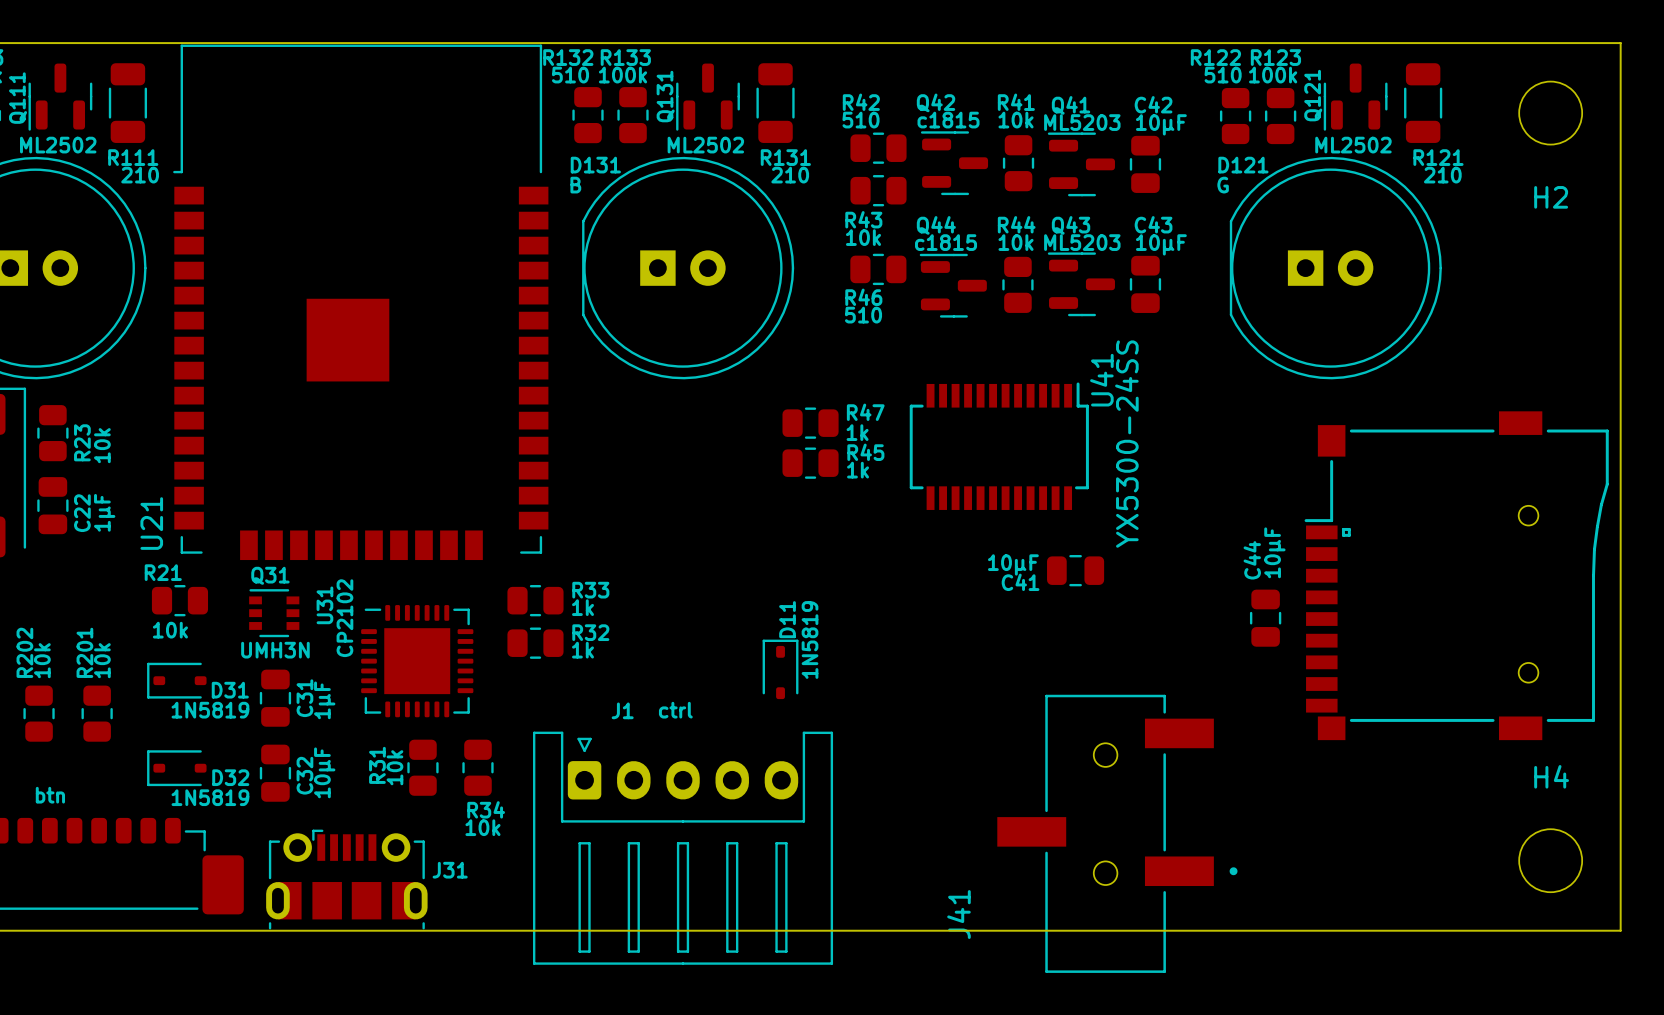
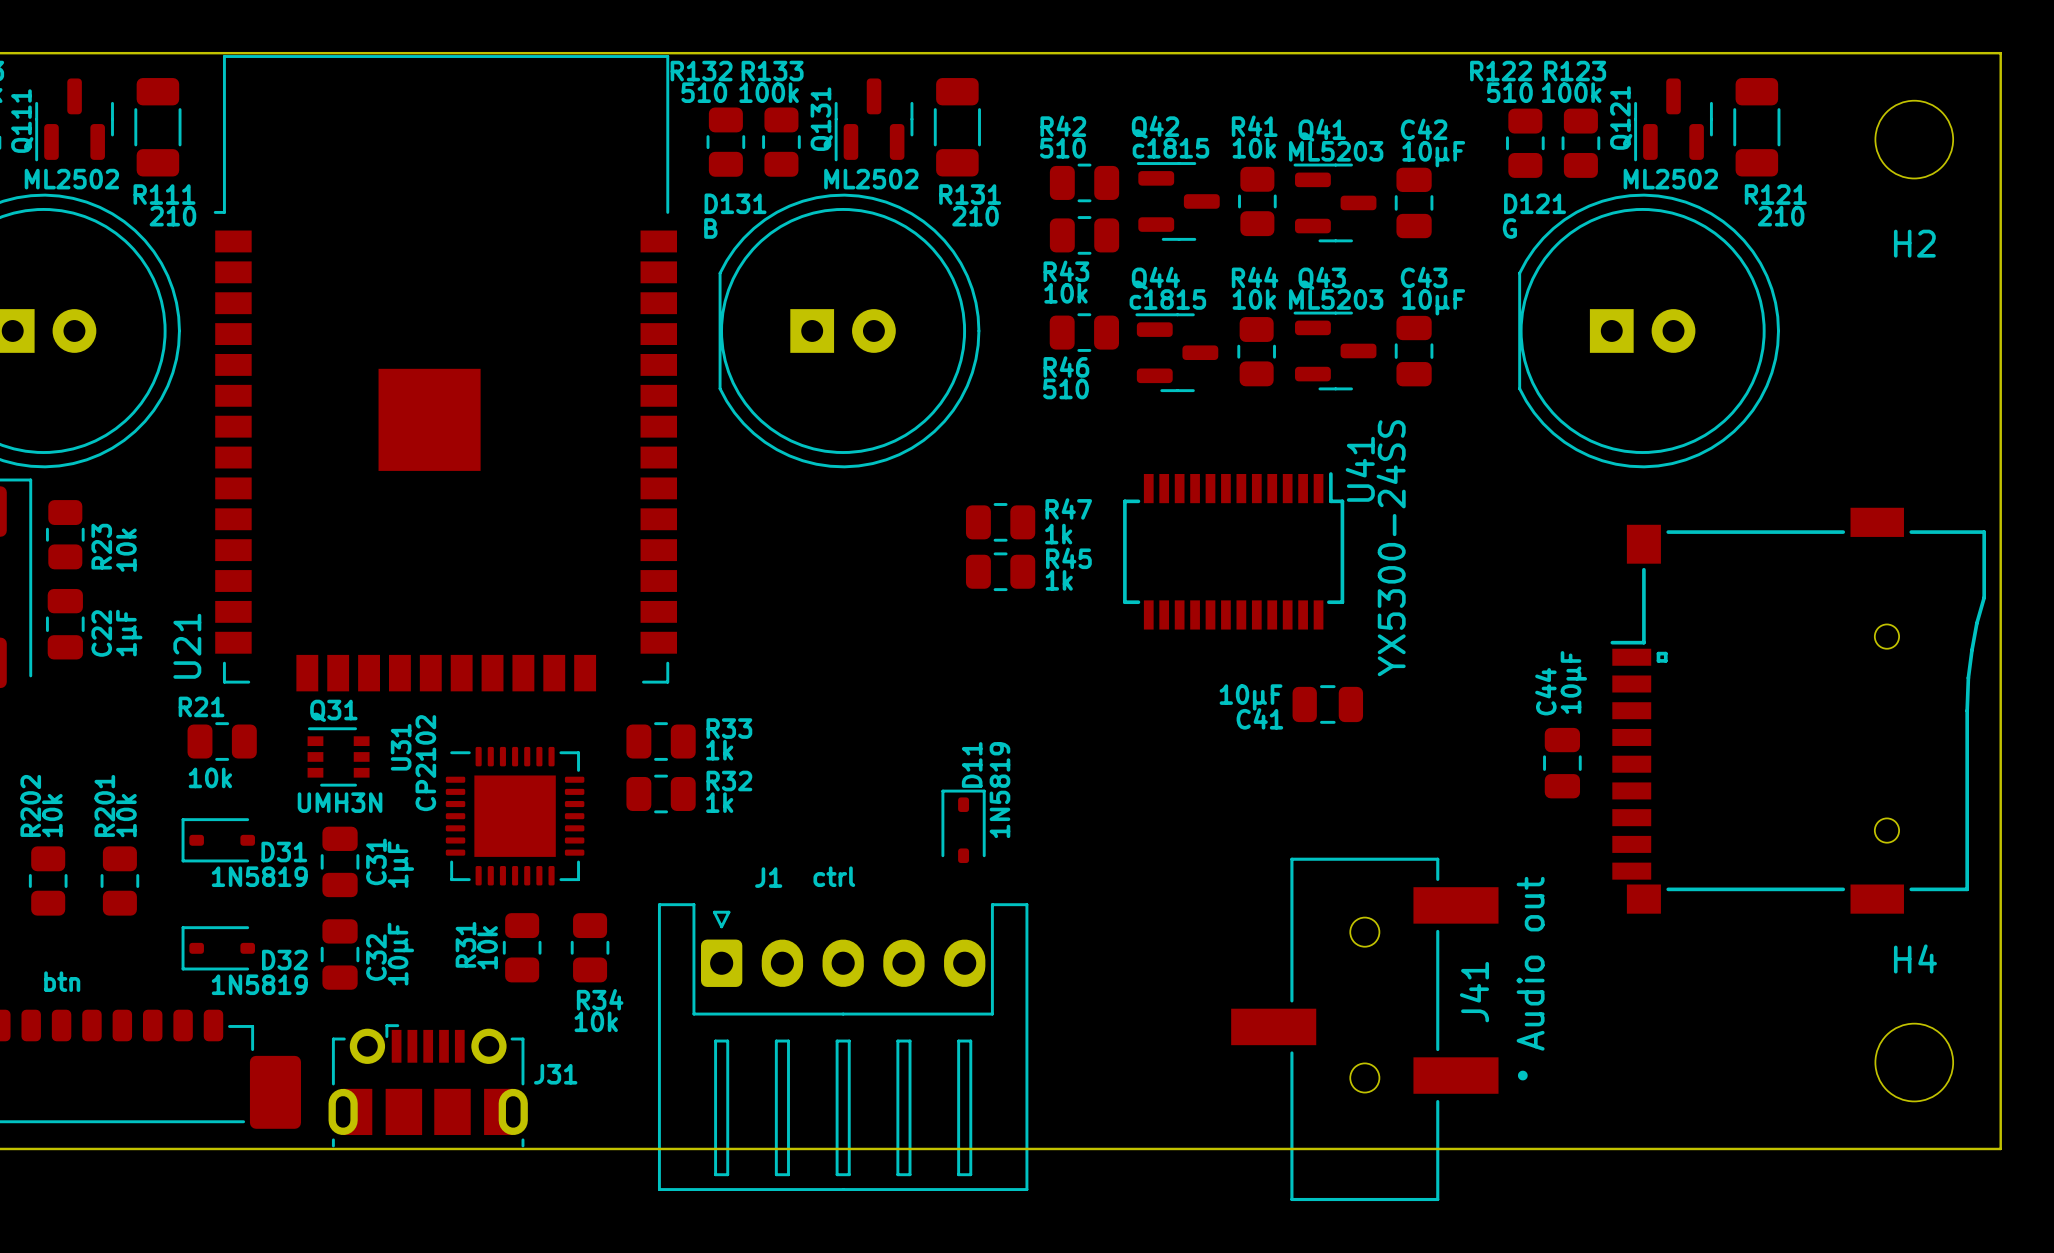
J41 value: none -> Audio out (1530, 963)
J41 name position: J41 (958, 914) -> J41 (1474, 992)

